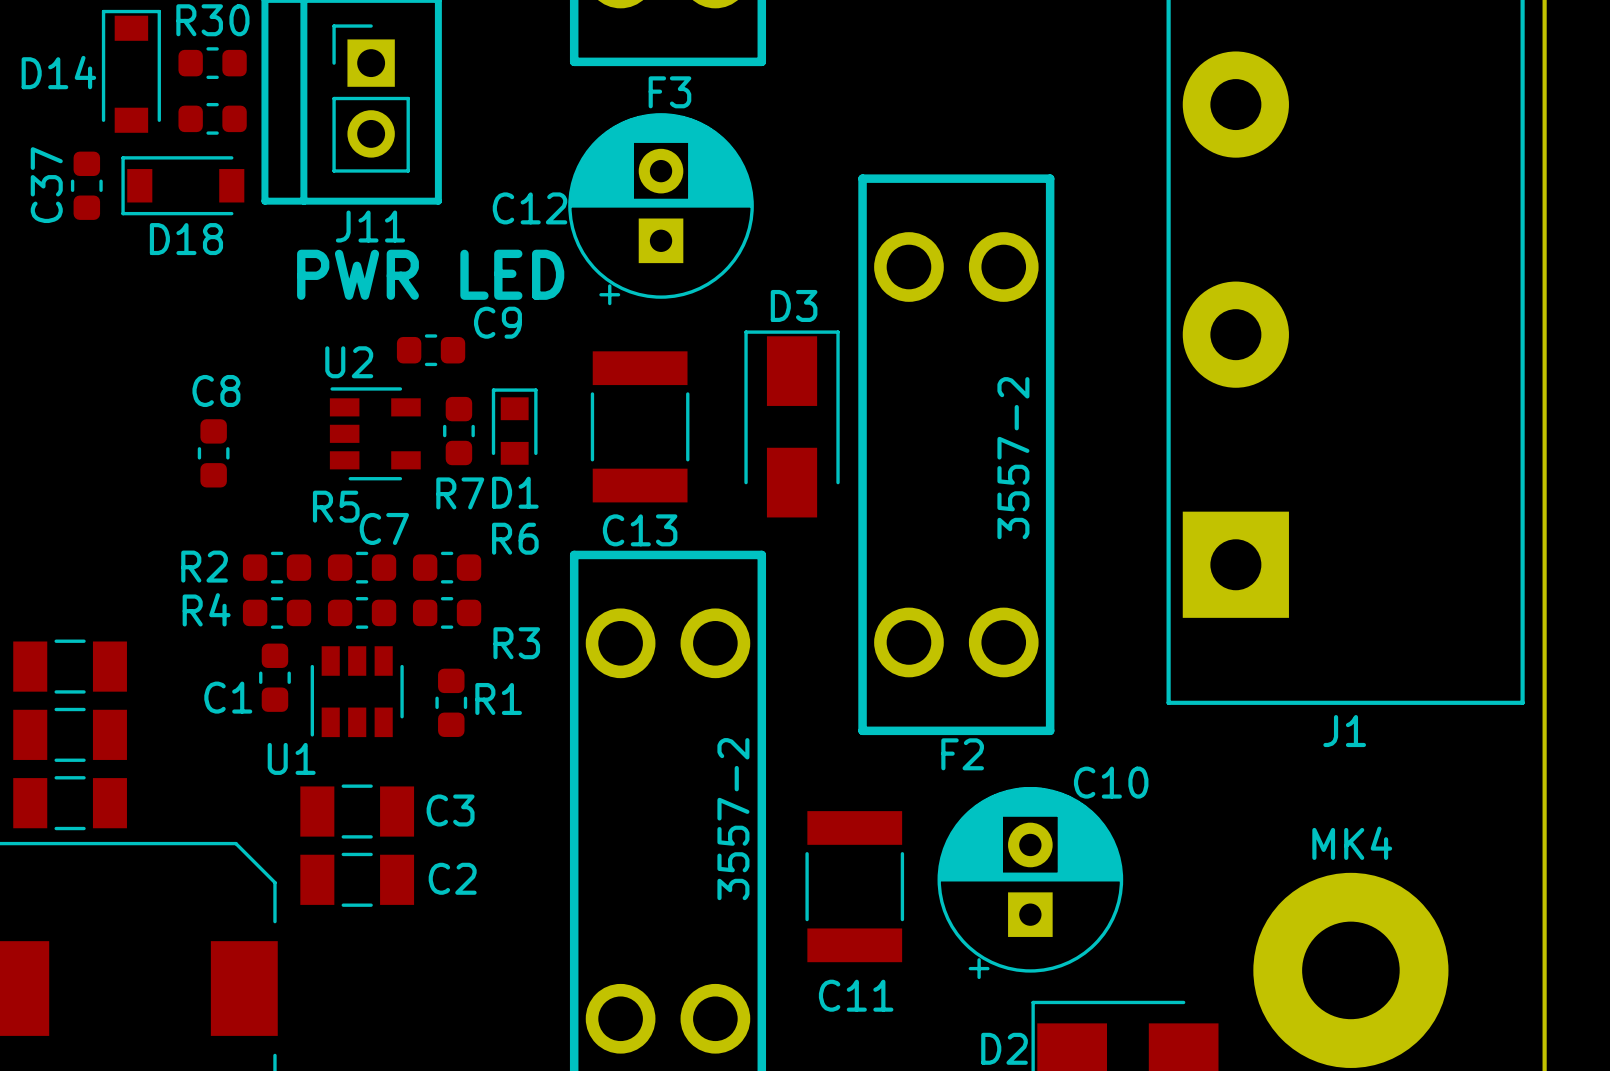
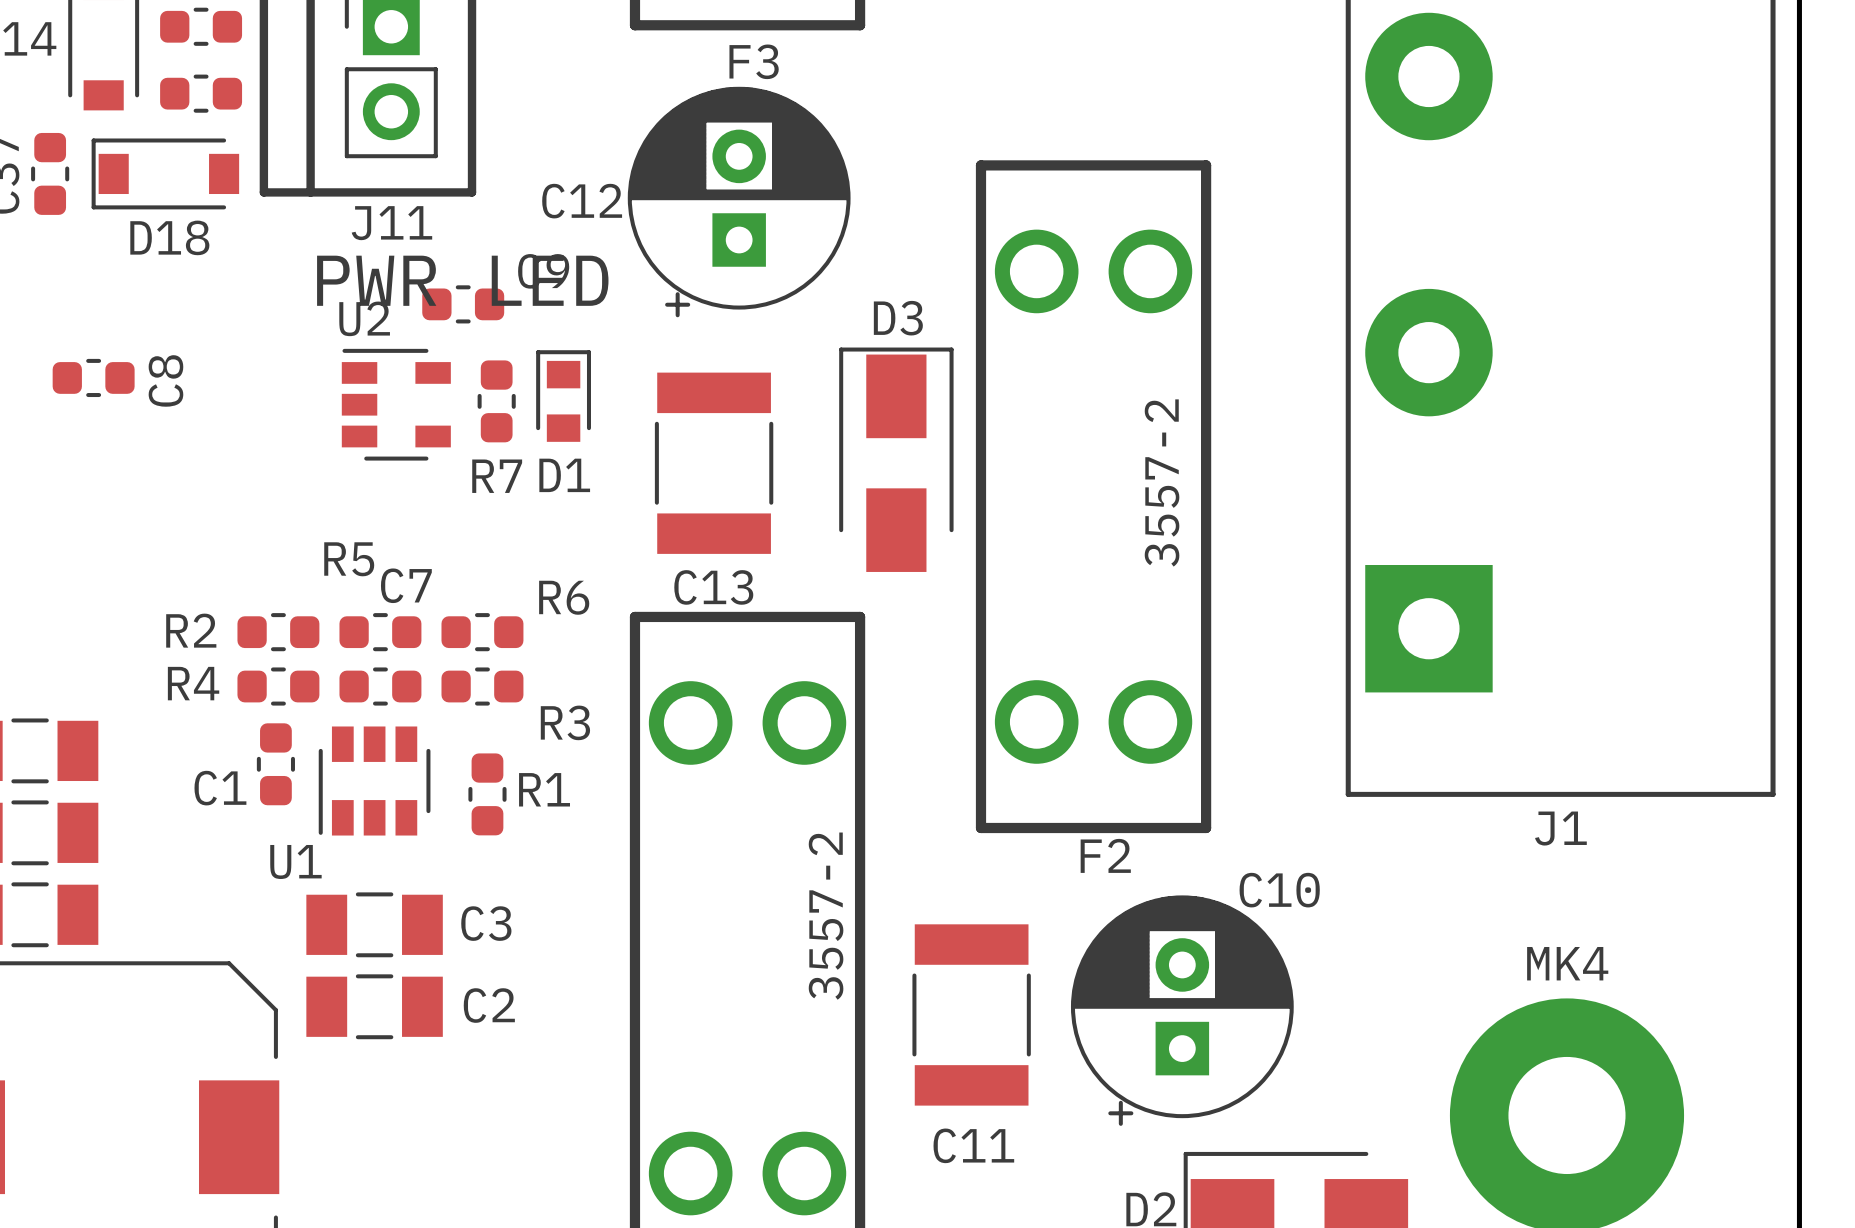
C9 position: (431, 350) -> (463, 304)
D1 position: (514, 426) -> (563, 396)
R7 position: (458, 431) -> (496, 401)
U2 position: (375, 433) -> (396, 404)
C8 rotation: 0° (213, 453) -> 90° clockwise (93, 377)
C8 position: (213, 453) -> (93, 377)

